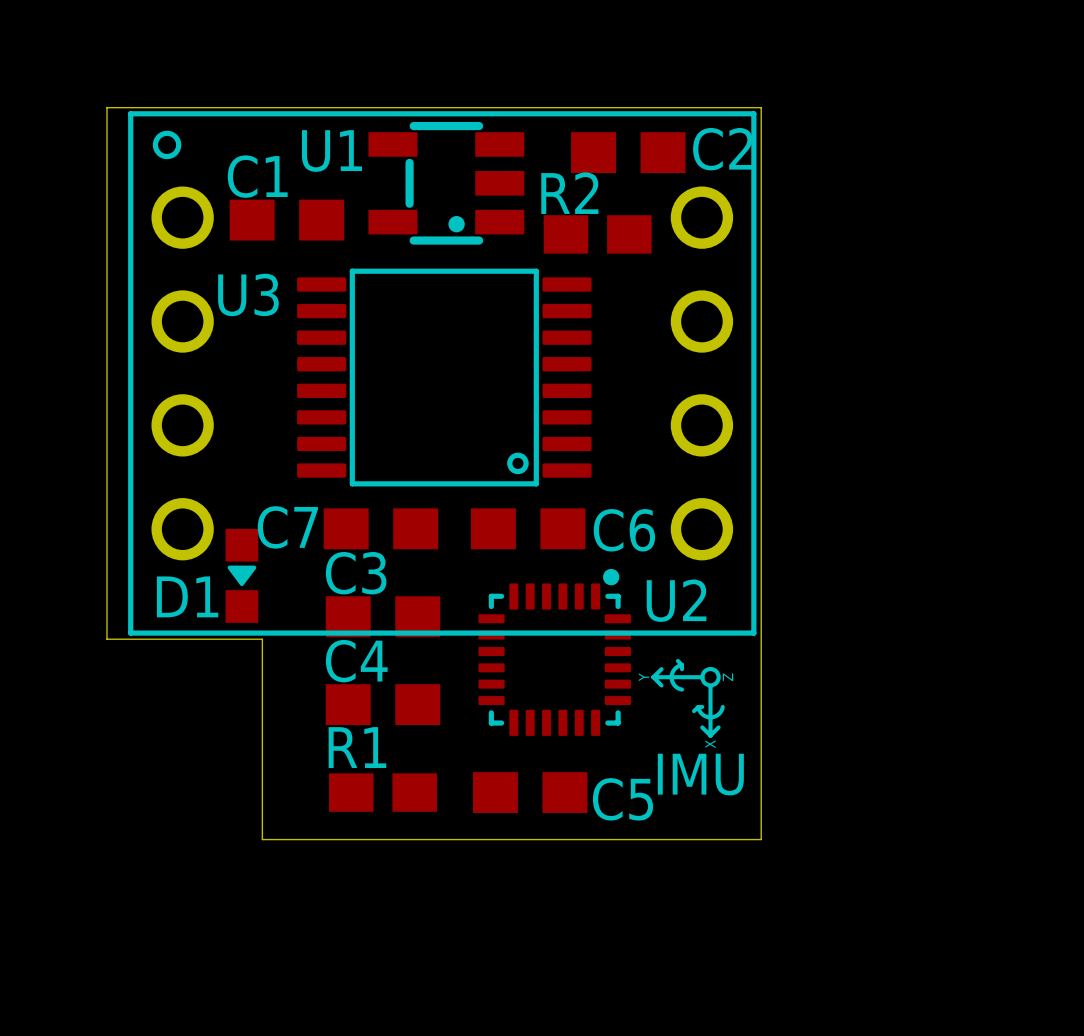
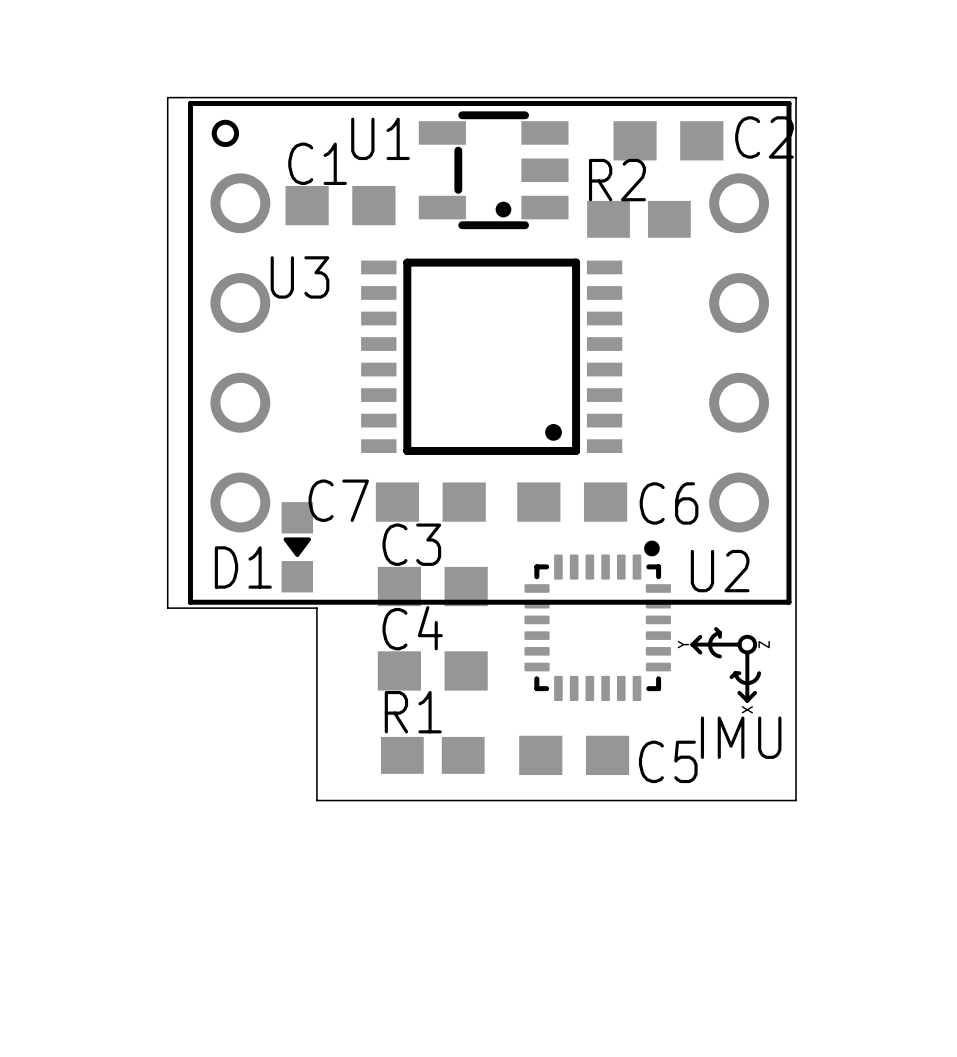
U3 footprint: [297, 268, 592, 487] -> [361, 258, 623, 455]

